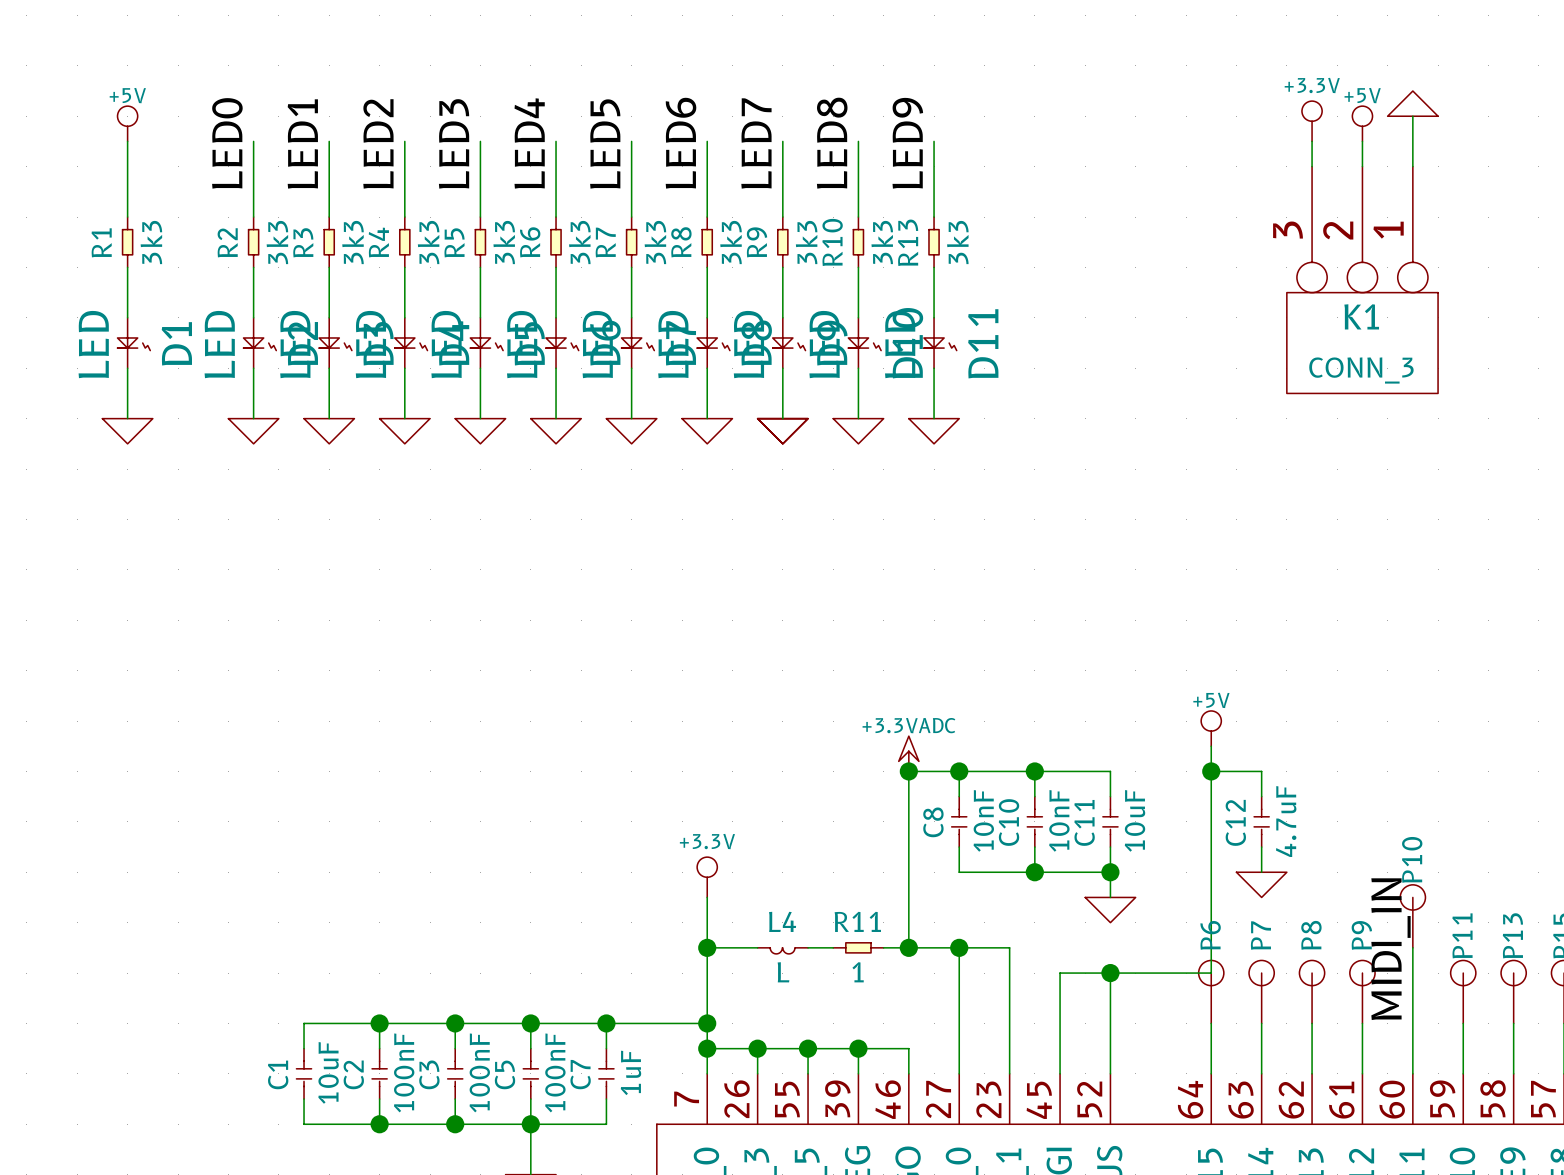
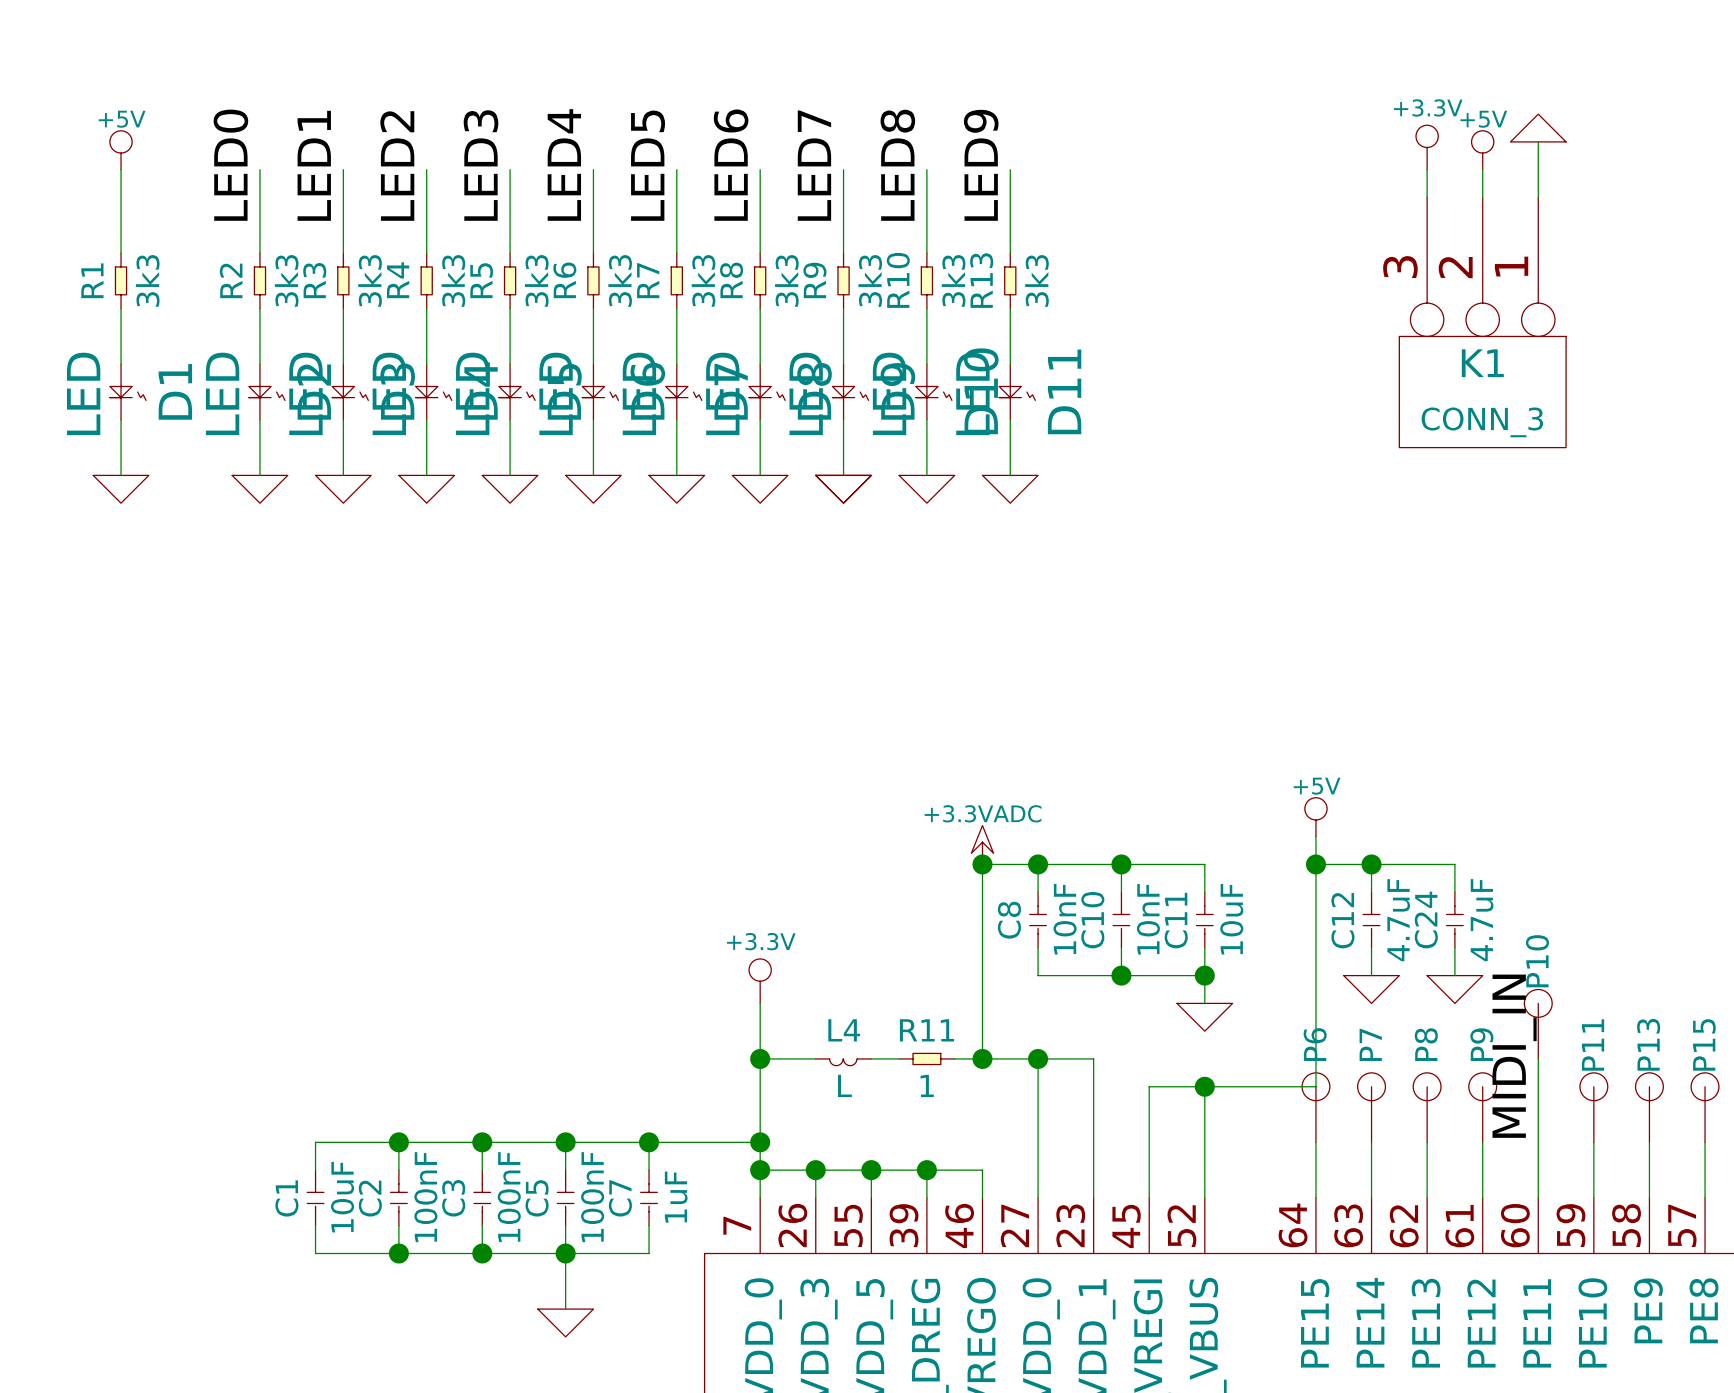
wire: none -> (1371, 864) (1454, 864) (1454, 892)
junction: none -> (1371, 864)
C24: none -> 4.7uF (1454, 920)
wire: none -> (1454, 947) (1454, 975)
power symbol: none -> (1454, 989)

